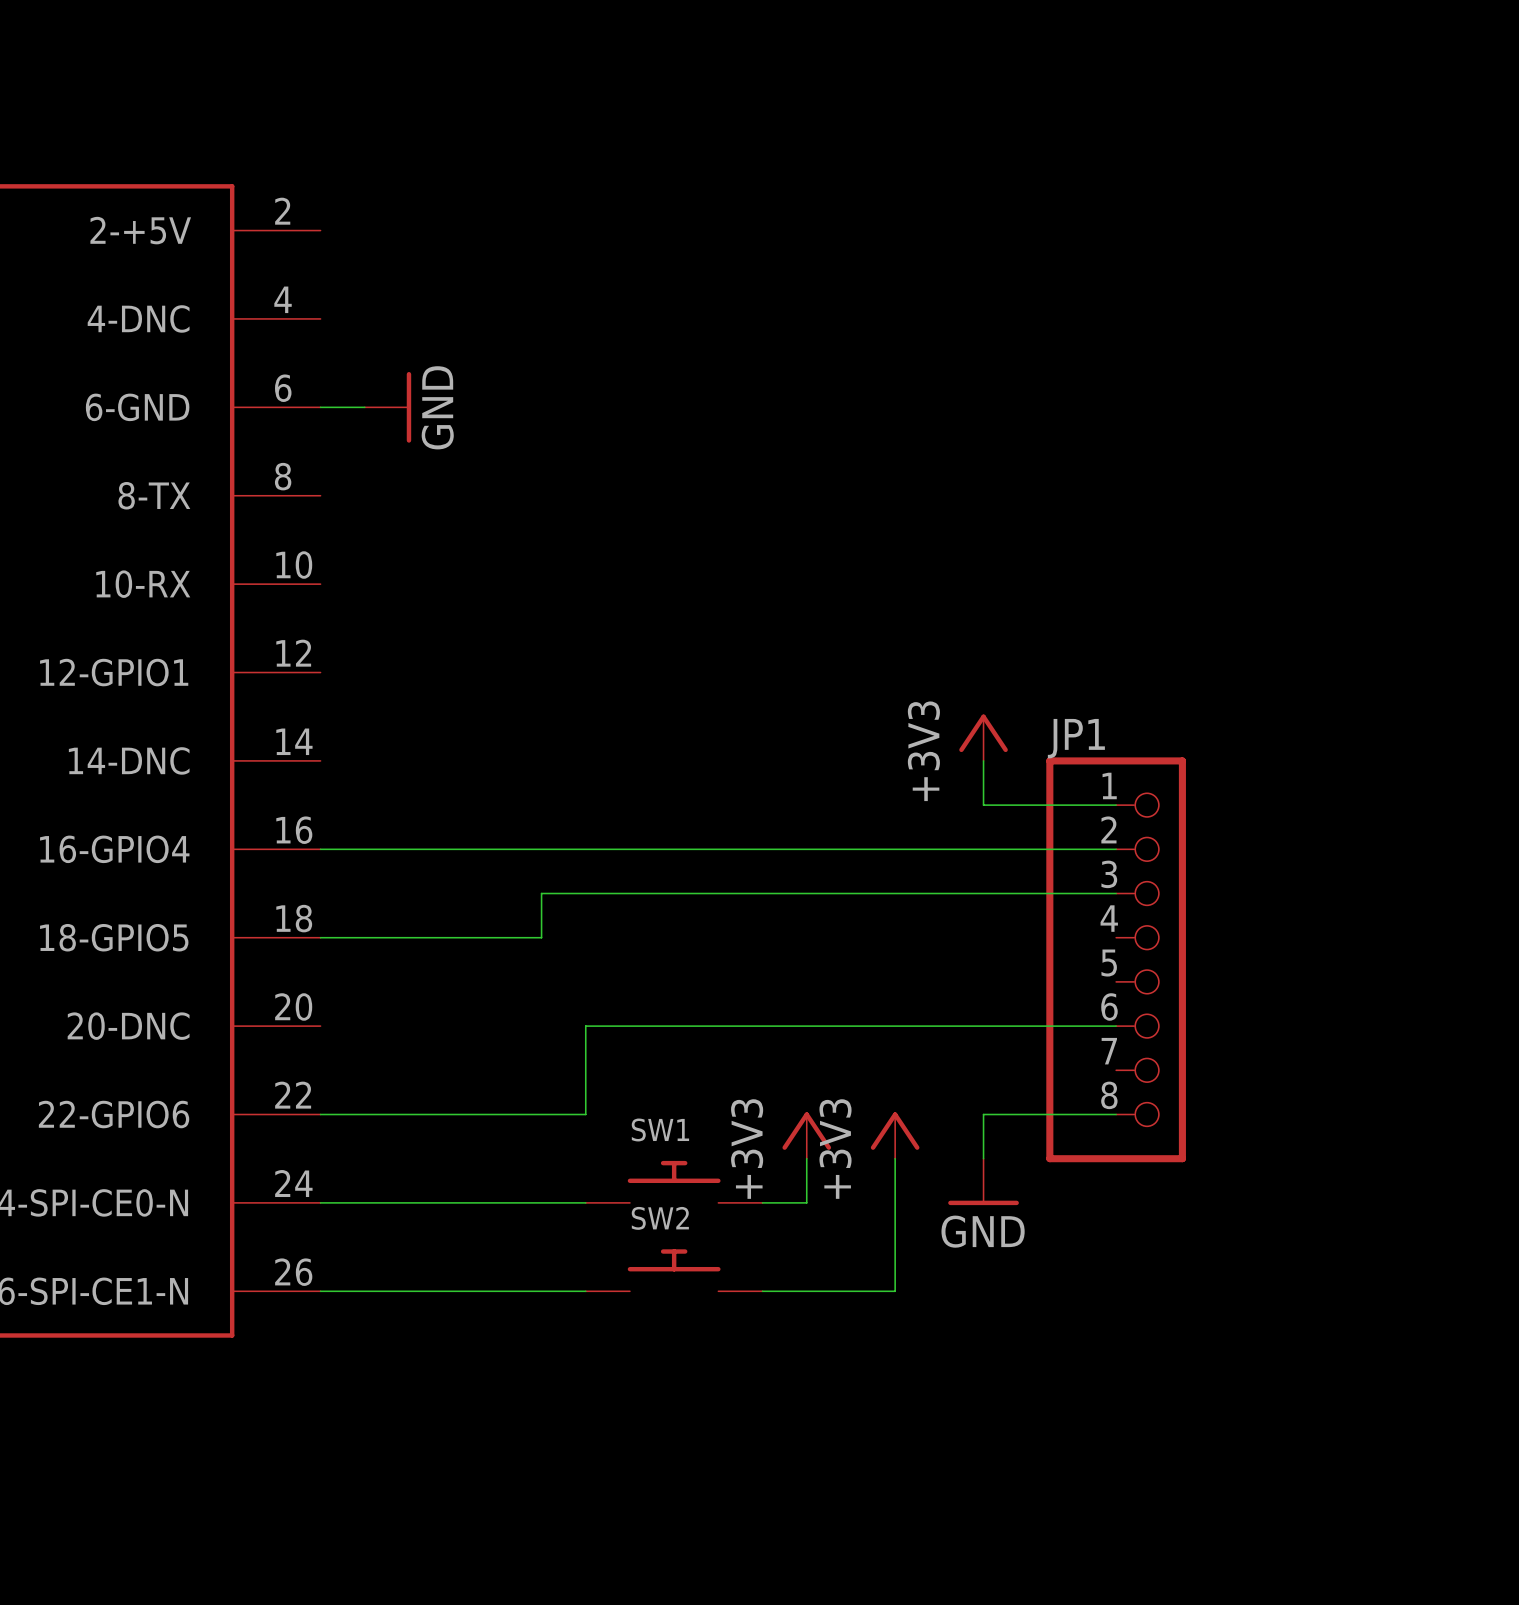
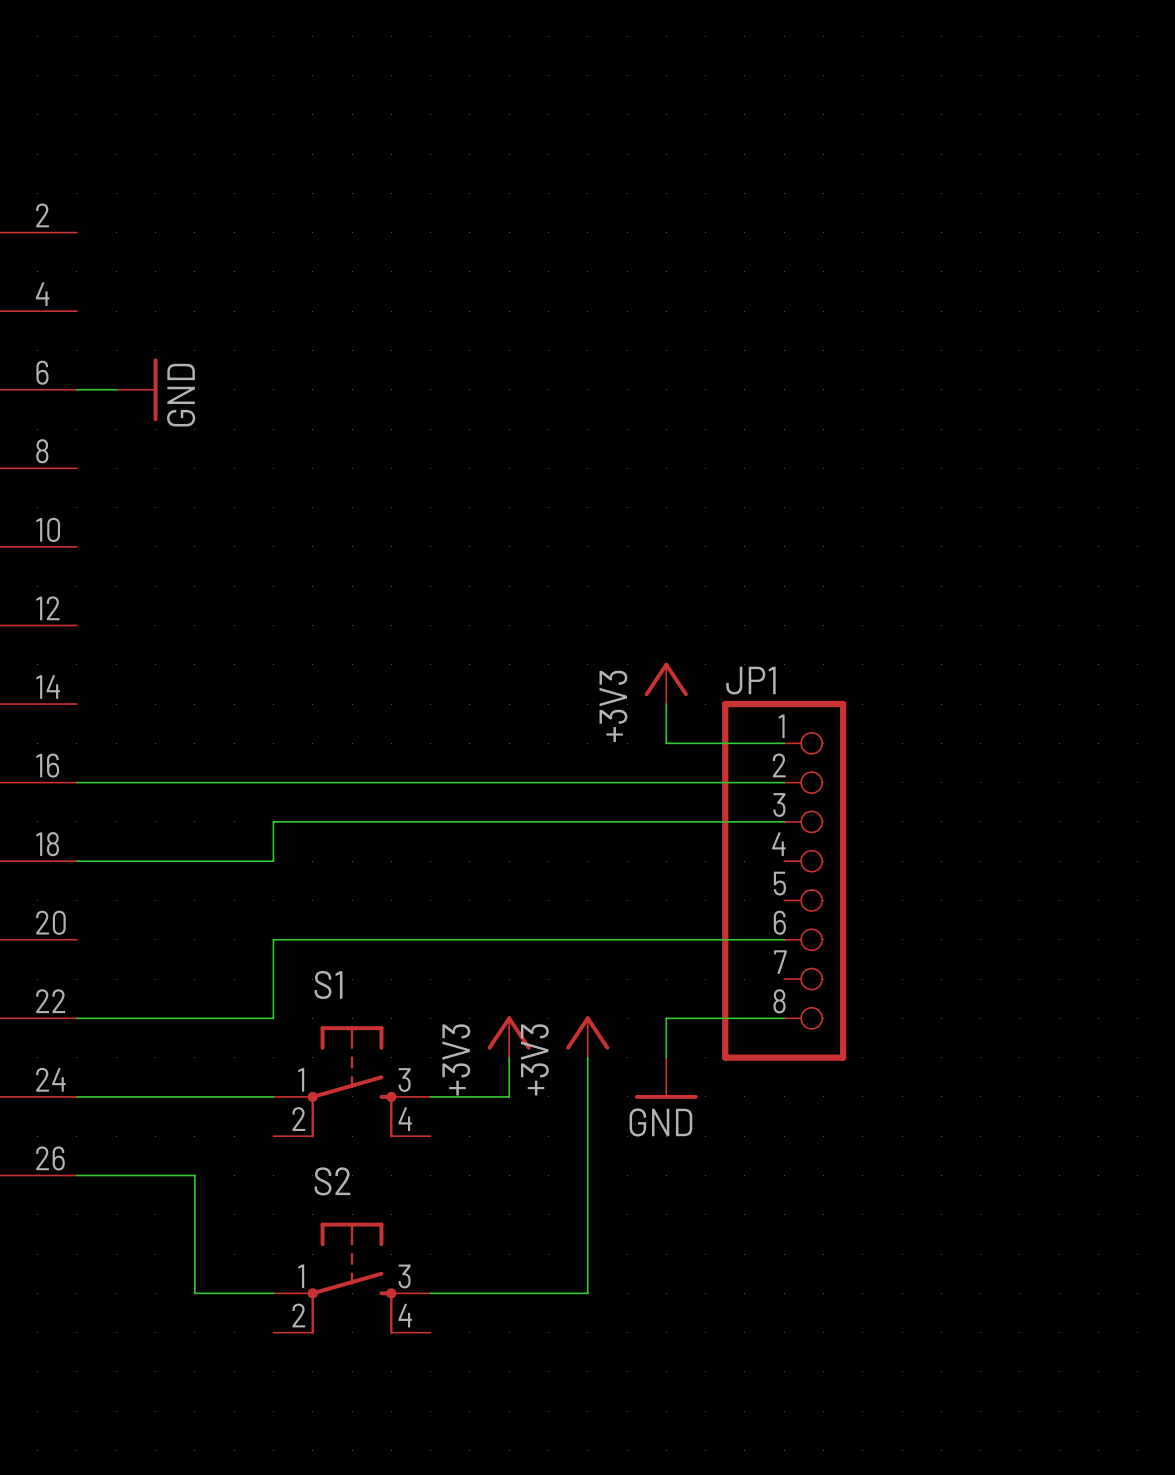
wire: (585, 1026) (585, 1114) (541, 1114) -> (312, 939) (273, 939) (273, 1018)
SW1: (674, 1181) -> none
S1: none -> (352, 1081)
SW2: (674, 1270) -> none
wire: (453, 1291) (585, 1291) -> (194, 1175) (194, 1293) (273, 1293)
wire: (762, 1291) (895, 1291) -> (430, 1293) (587, 1293) (587, 1175)
S2: none -> (352, 1278)

